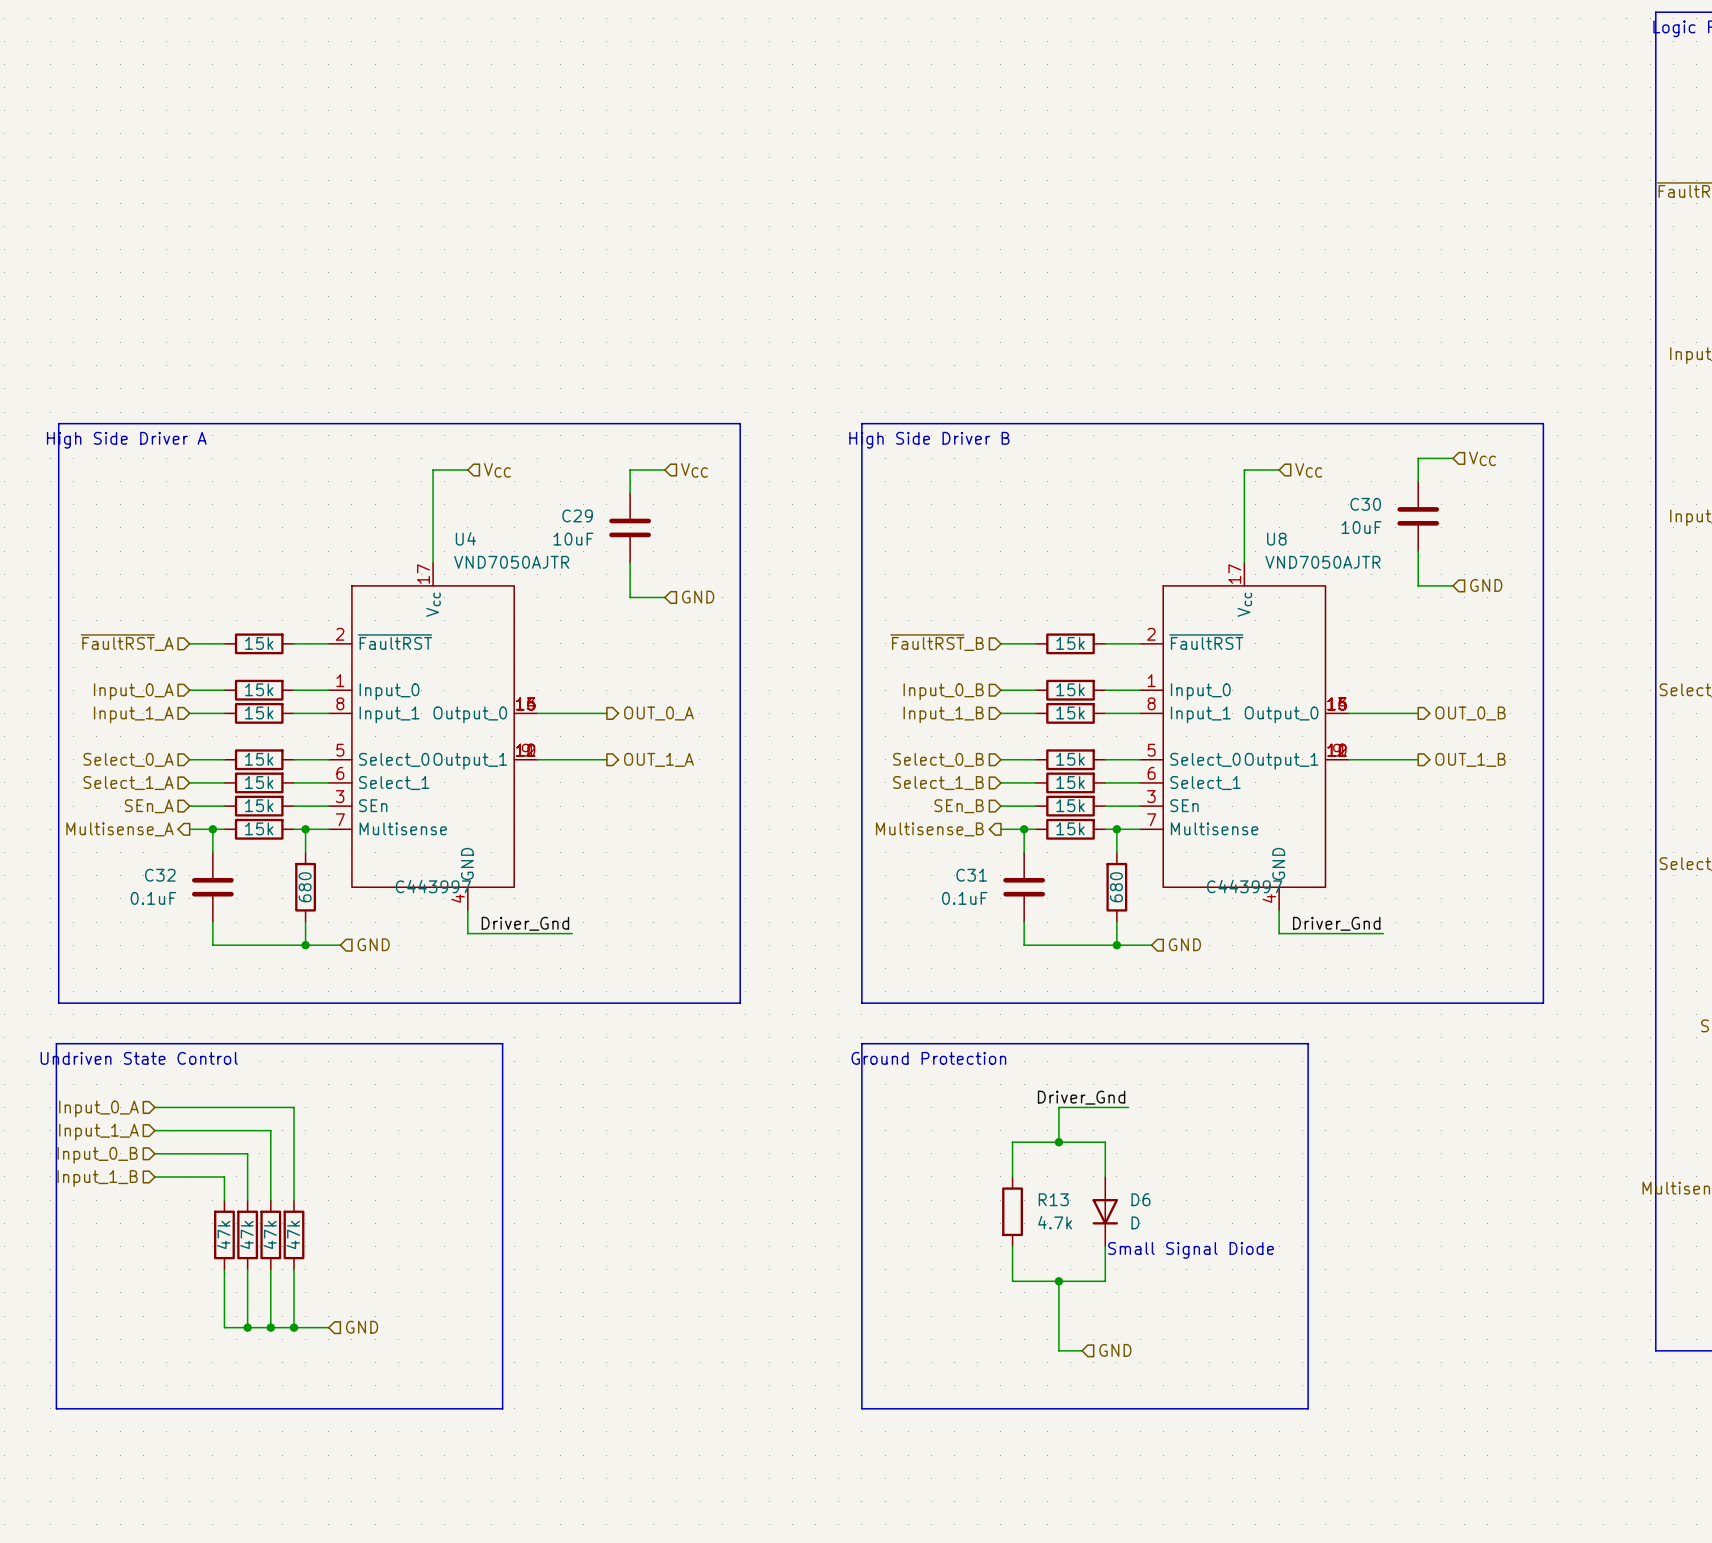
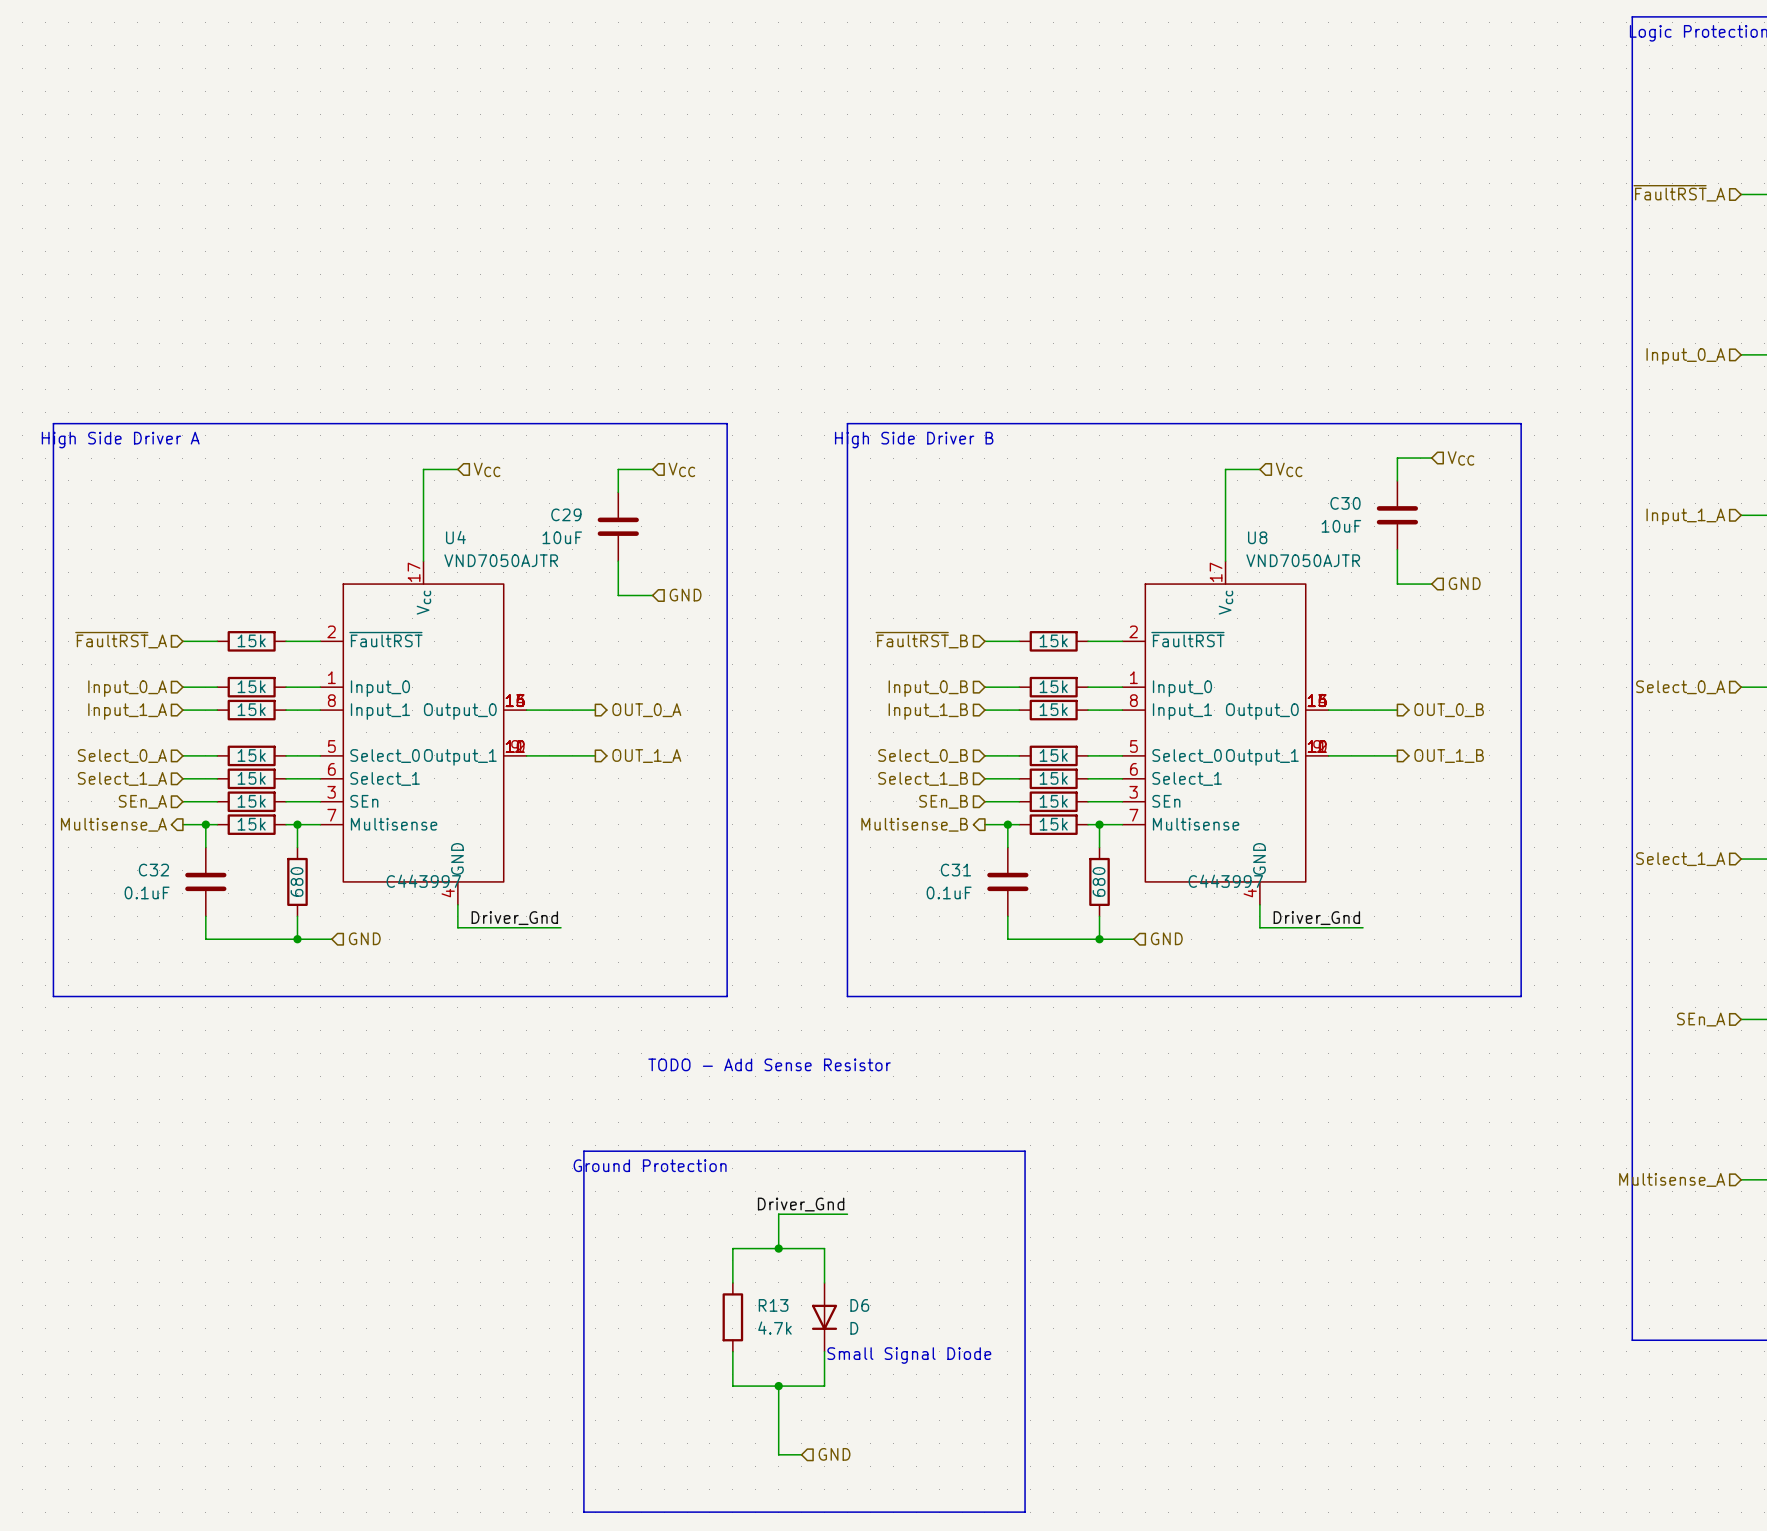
line: (56, 1043) (502, 1043) (502, 1408) (56, 1408) (56, 1043) -> none
line: (861, 1043) (1308, 1043) (1308, 1408) (861, 1408) (861, 1043) -> none
text: Undriven State Control (139, 1058) -> none
text: Ground Protection (928, 1058) -> none
text: none -> TODO - Add Sense Resistor (769, 1064)
label: Driver_Gnd (1081, 1097) -> none
wire: (154, 1107) (293, 1107) (293, 1200) -> none
wire: (1128, 1107) (1058, 1107) (1058, 1142) -> none
hierarchical label: Input_0_A (98, 1108) -> none
wire: (154, 1130) (270, 1130) (270, 1200) -> none
hierarchical label: Input_1_A (98, 1132) -> none
junction: (1058, 1142) -> none
wire: (154, 1153) (247, 1153) (247, 1200) -> none
hierarchical label: Input_0_B (97, 1155) -> none
line: none -> (583, 1151) (1025, 1151) (1025, 1512) (583, 1512) (583, 1151)
text: none -> Ground Protection (650, 1165)
wire: (154, 1176) (224, 1176) (224, 1200) -> none
wire: (1012, 1176) (1012, 1142) (1105, 1142) (1105, 1176) -> none
hierarchical label: Input_1_B (97, 1178) -> none
R13 position: (1012, 1211) -> (732, 1317)
D6 position: (1105, 1211) -> (824, 1317)
label: none -> Driver_Gnd (801, 1204)
wire: none -> (847, 1214) (778, 1214) (778, 1248)
part: 47k (224, 1234) -> none
part: 47k (247, 1234) -> none
part: 47k (270, 1234) -> none
part: 47k (293, 1234) -> none
wire: (1012, 1246) (1012, 1281) (1105, 1281) (1105, 1246) -> none
text: Small Signal Diode (1191, 1250) -> none
junction: none -> (778, 1248)
wire: (224, 1269) (224, 1327) (328, 1327) -> none
wire: (247, 1269) (247, 1327) -> none
wire: (270, 1269) (270, 1327) -> none
wire: (293, 1269) (293, 1327) -> none
wire: (1058, 1281) (1058, 1350) (1082, 1350) -> none
junction: (1058, 1281) -> none
wire: none -> (732, 1282) (732, 1248) (824, 1248) (824, 1282)
junction: (247, 1327) -> none
junction: (270, 1327) -> none
junction: (293, 1327) -> none
hierarchical label: GND (362, 1327) -> none
hierarchical label: GND (1115, 1350) -> none
wire: none -> (732, 1351) (732, 1386) (824, 1386) (824, 1351)
text: none -> Small Signal Diode (909, 1355)
wire: none -> (778, 1386) (778, 1454) (801, 1454)
junction: none -> (778, 1386)
hierarchical label: none -> GND (834, 1454)

